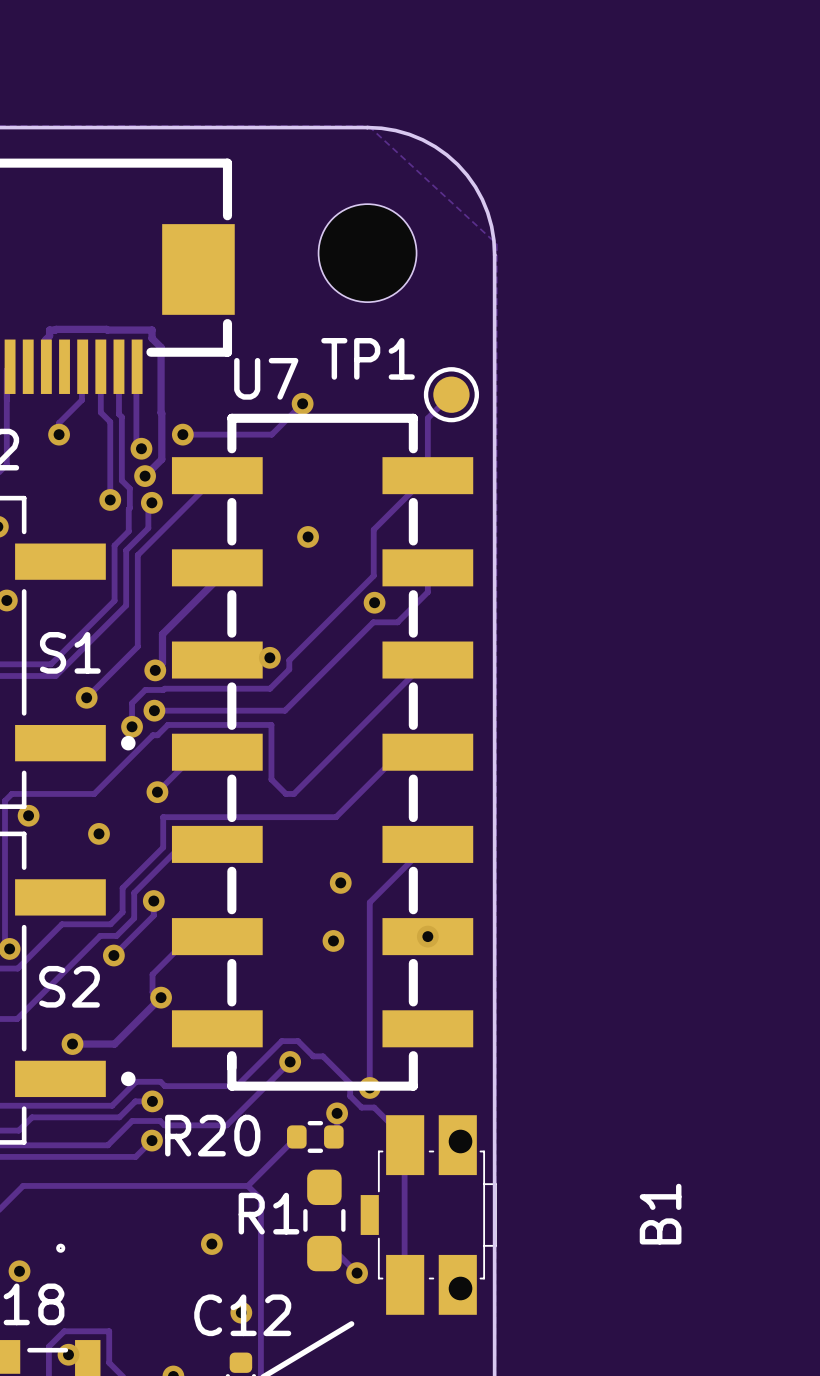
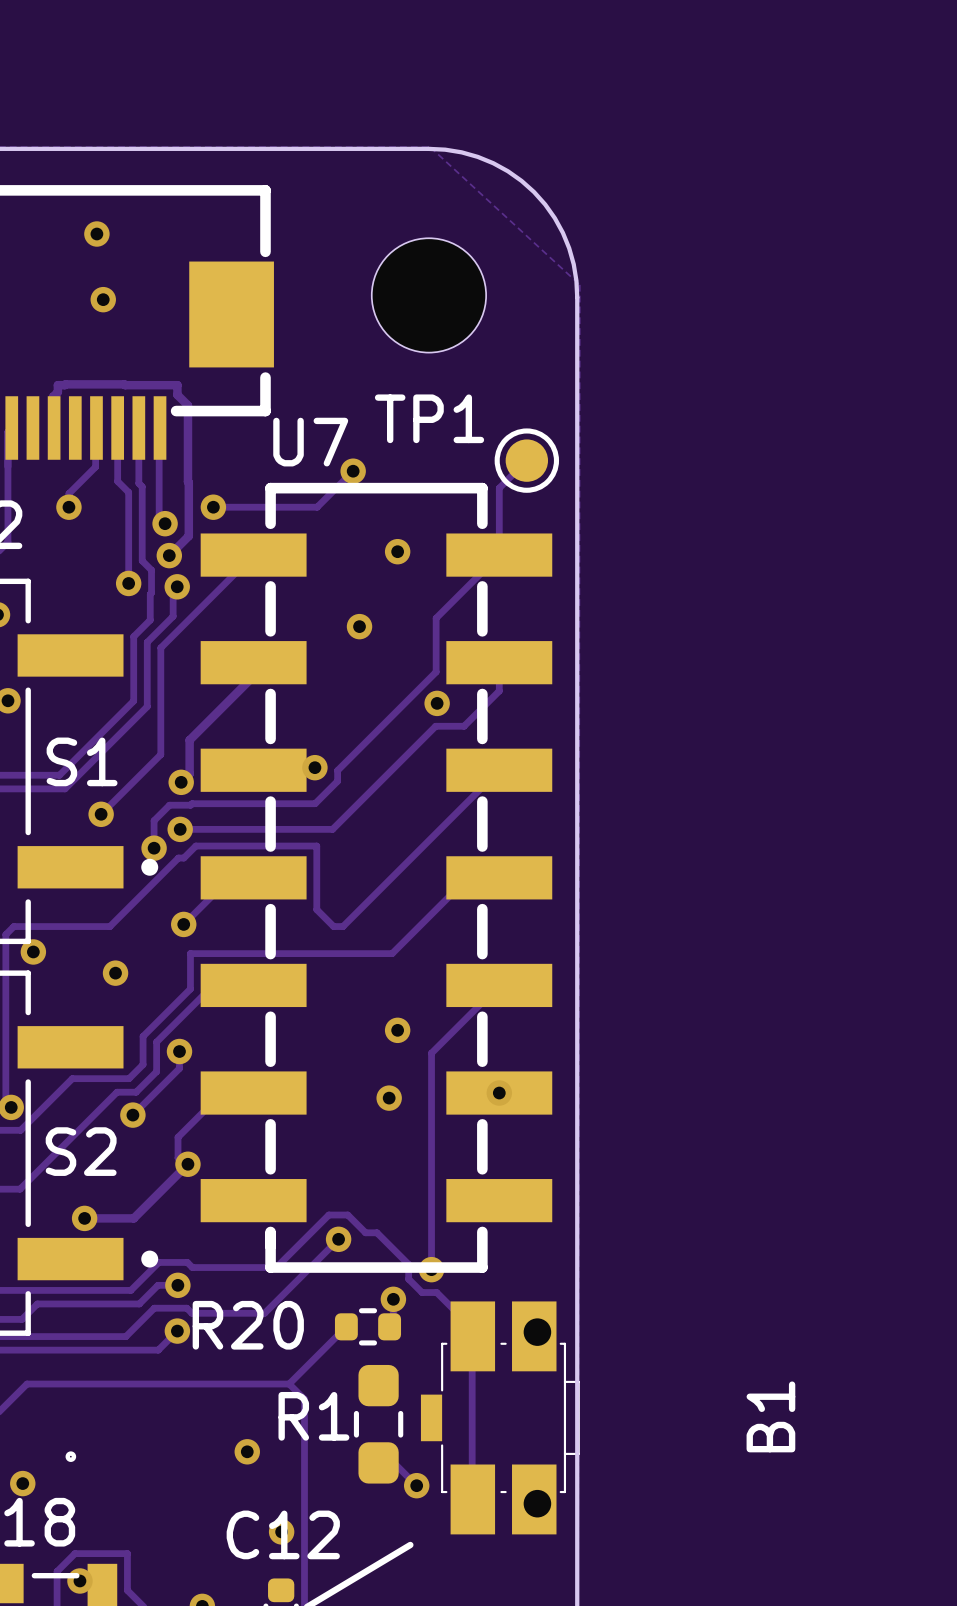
via: none -> (96, 234)
via: none -> (103, 299)
via: none -> (397, 551)

